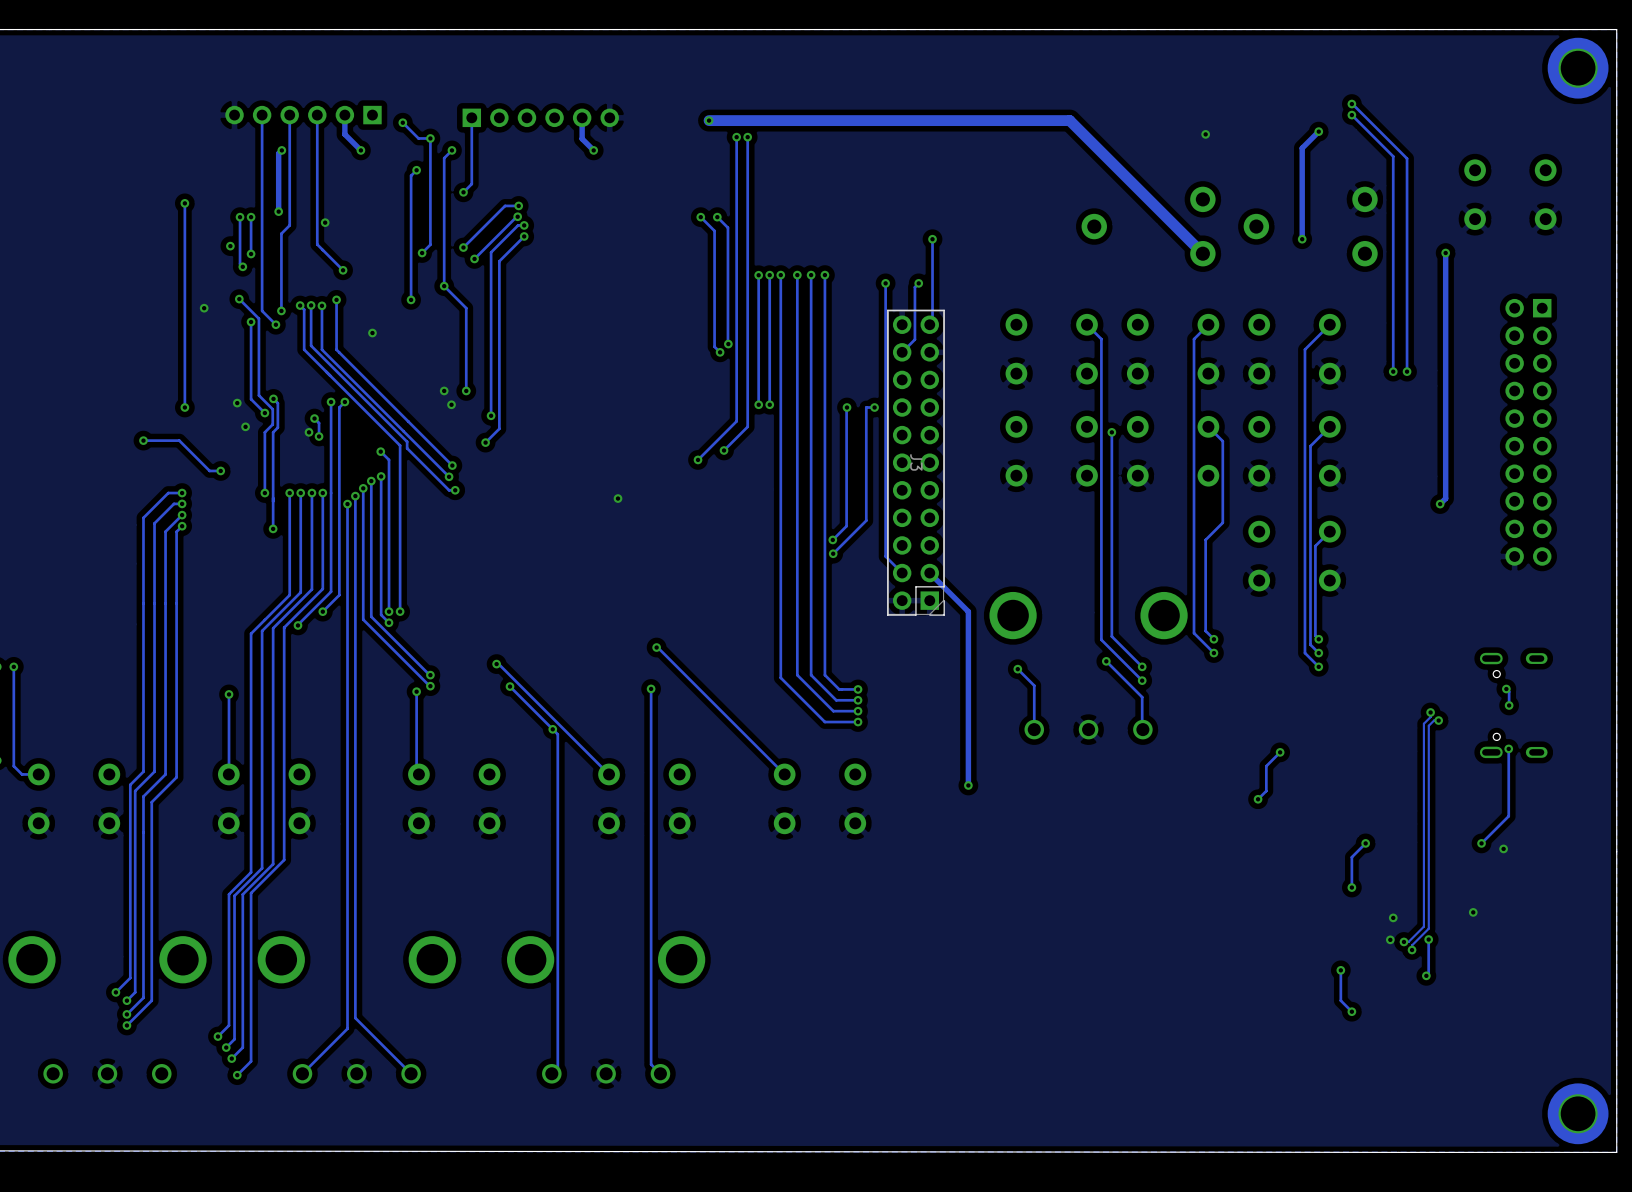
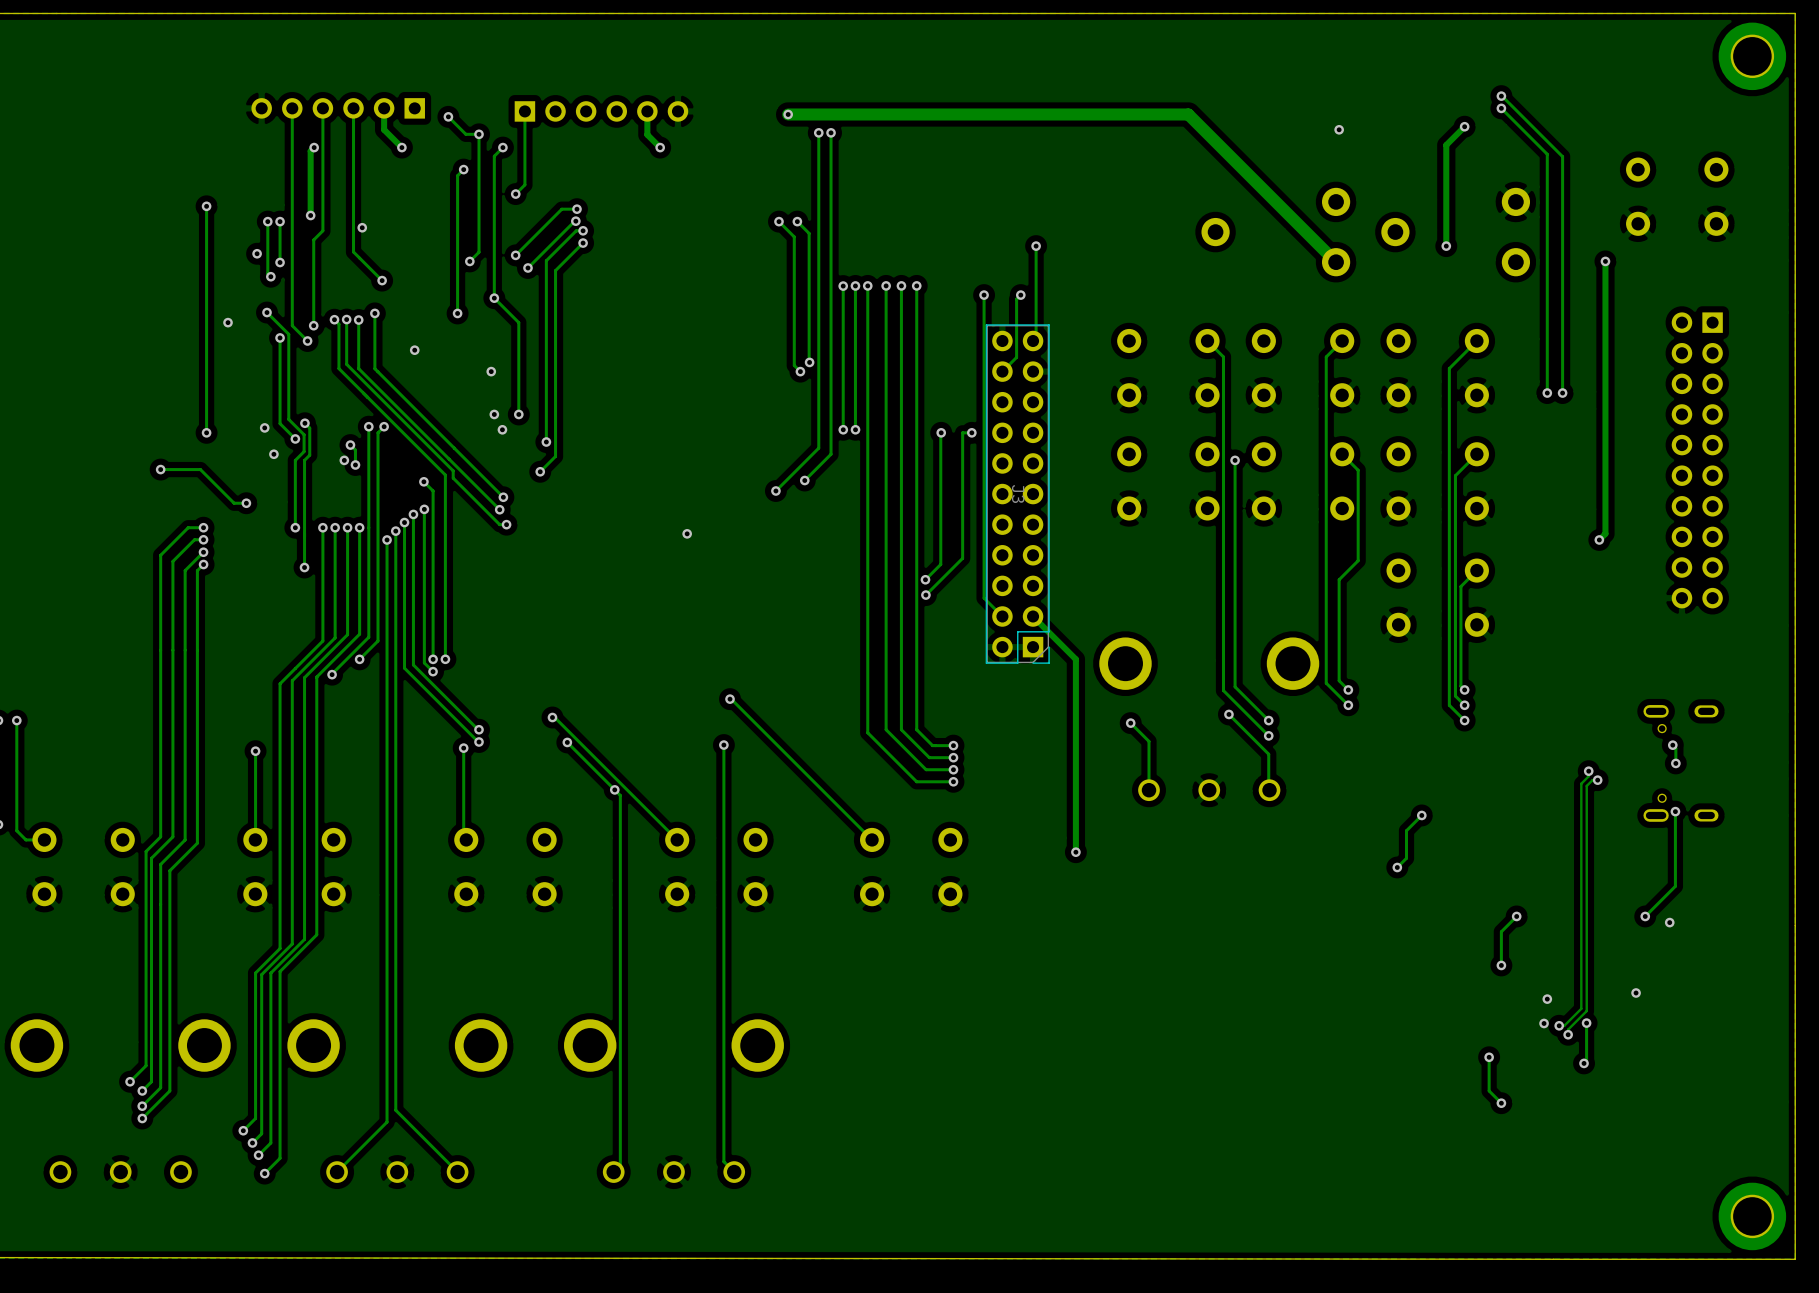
via: none -> (491, 371)

